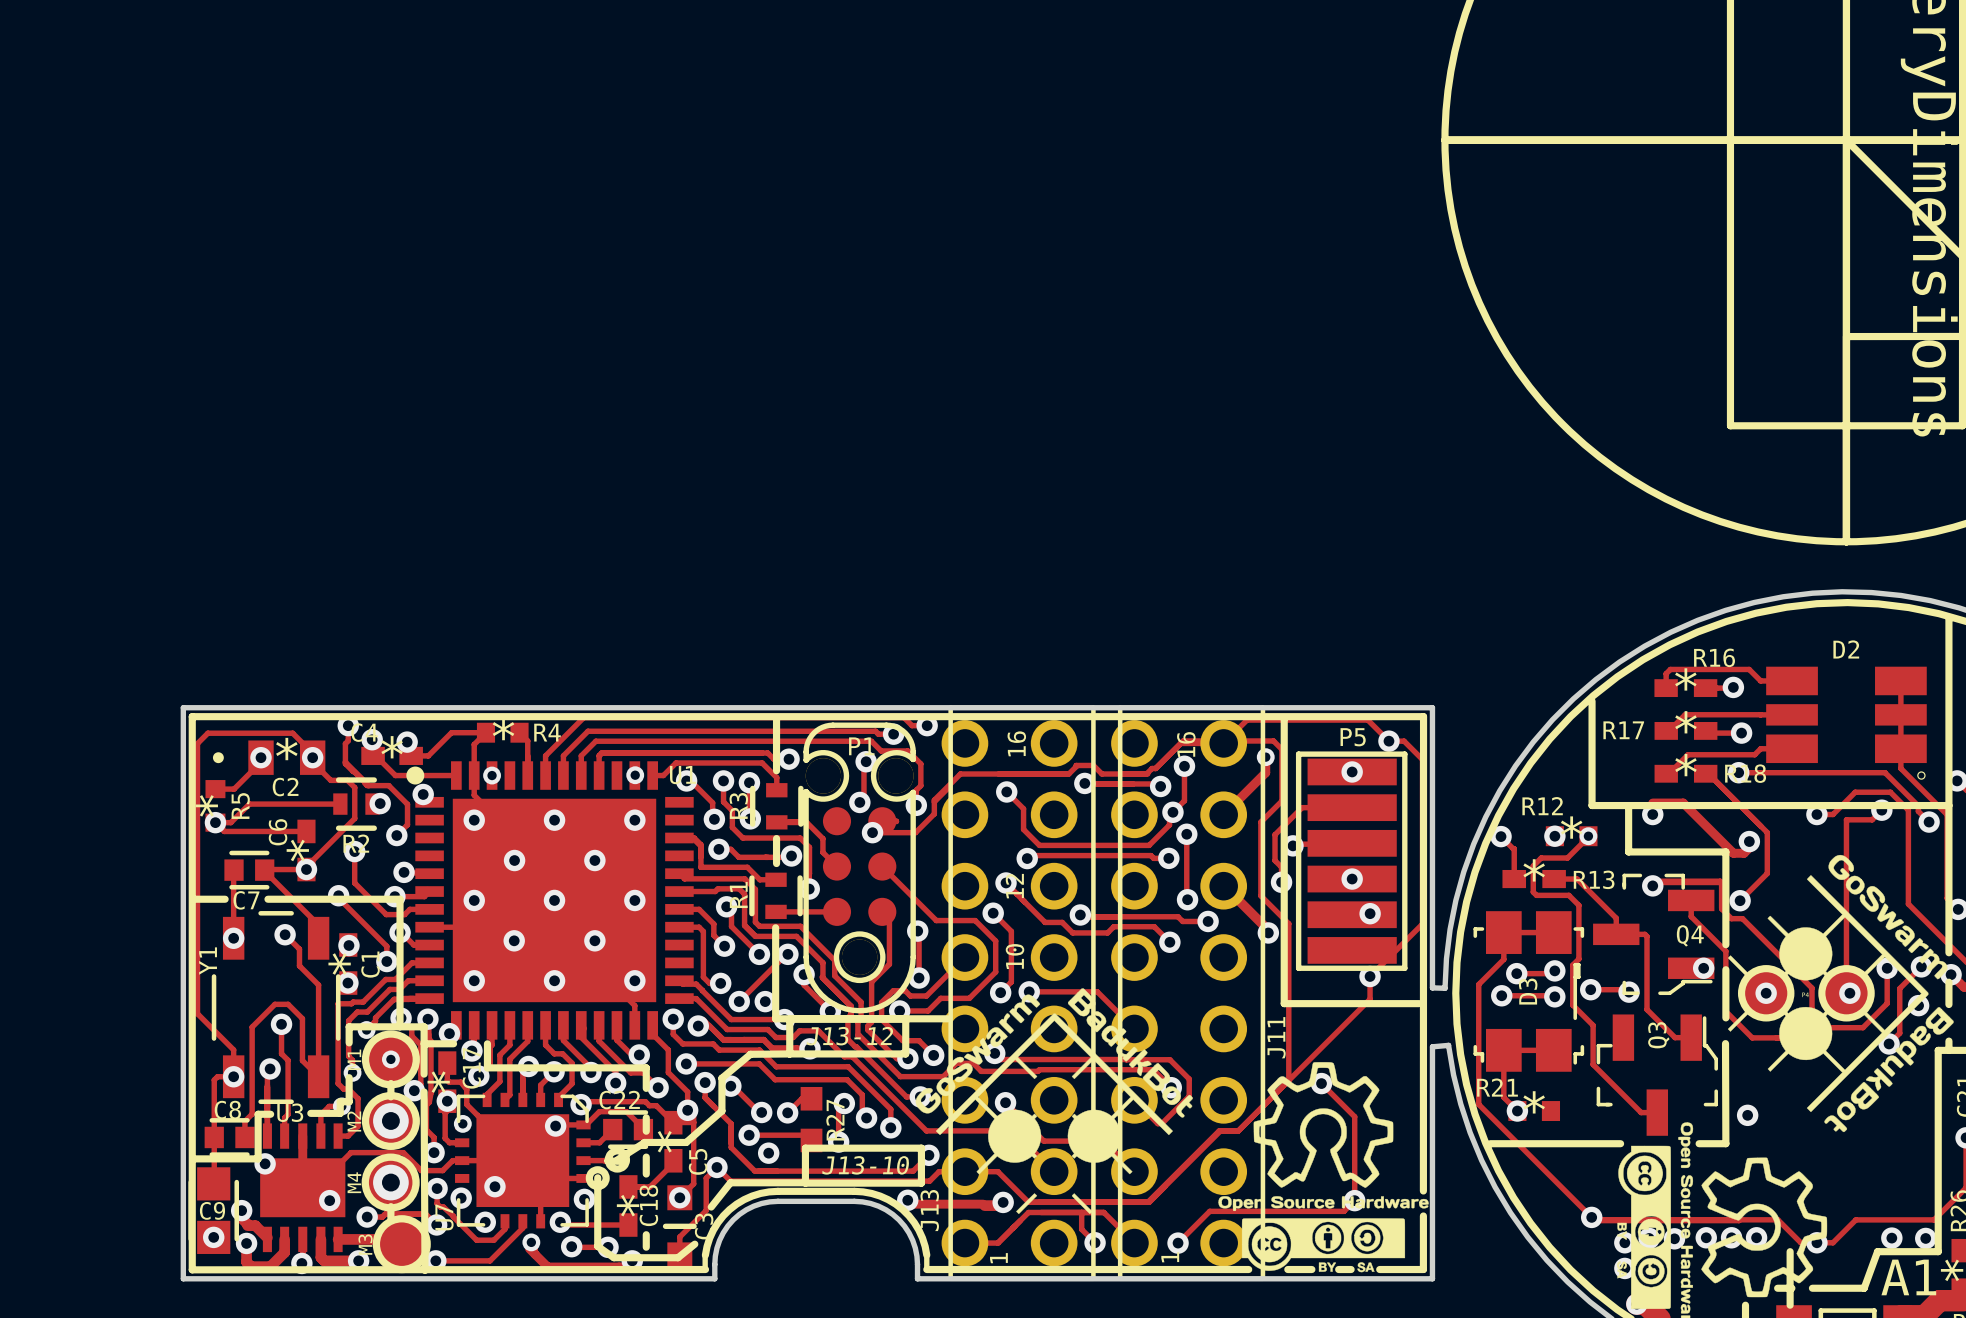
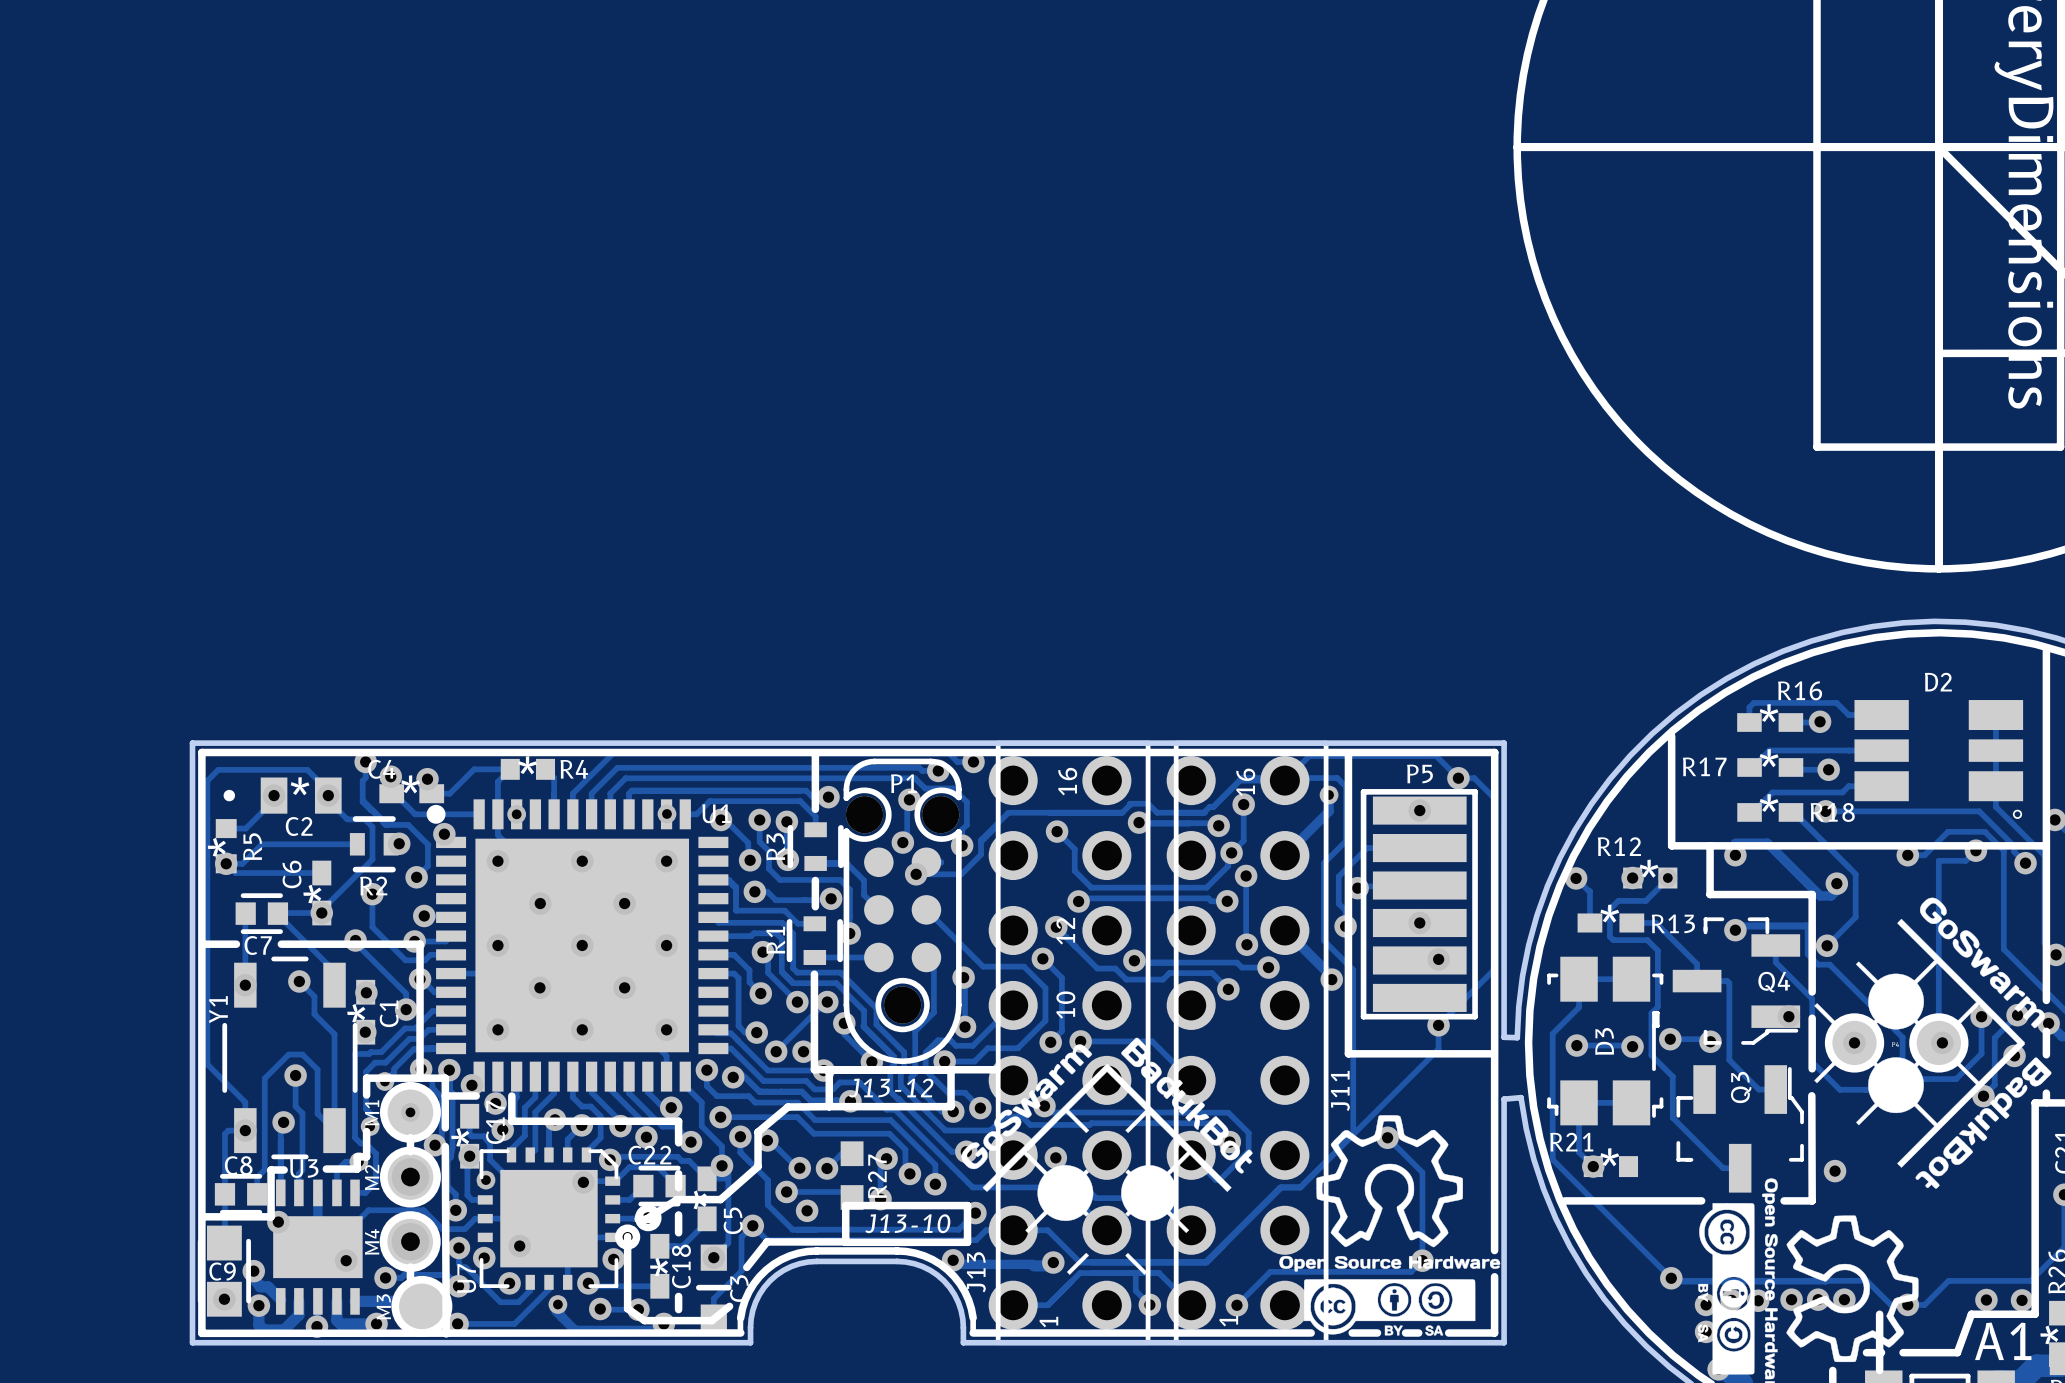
track: (1554, 970) (1552, 973) (1516, 973) -> none
via: (1554, 970) -> none
via: (1516, 973) -> none

